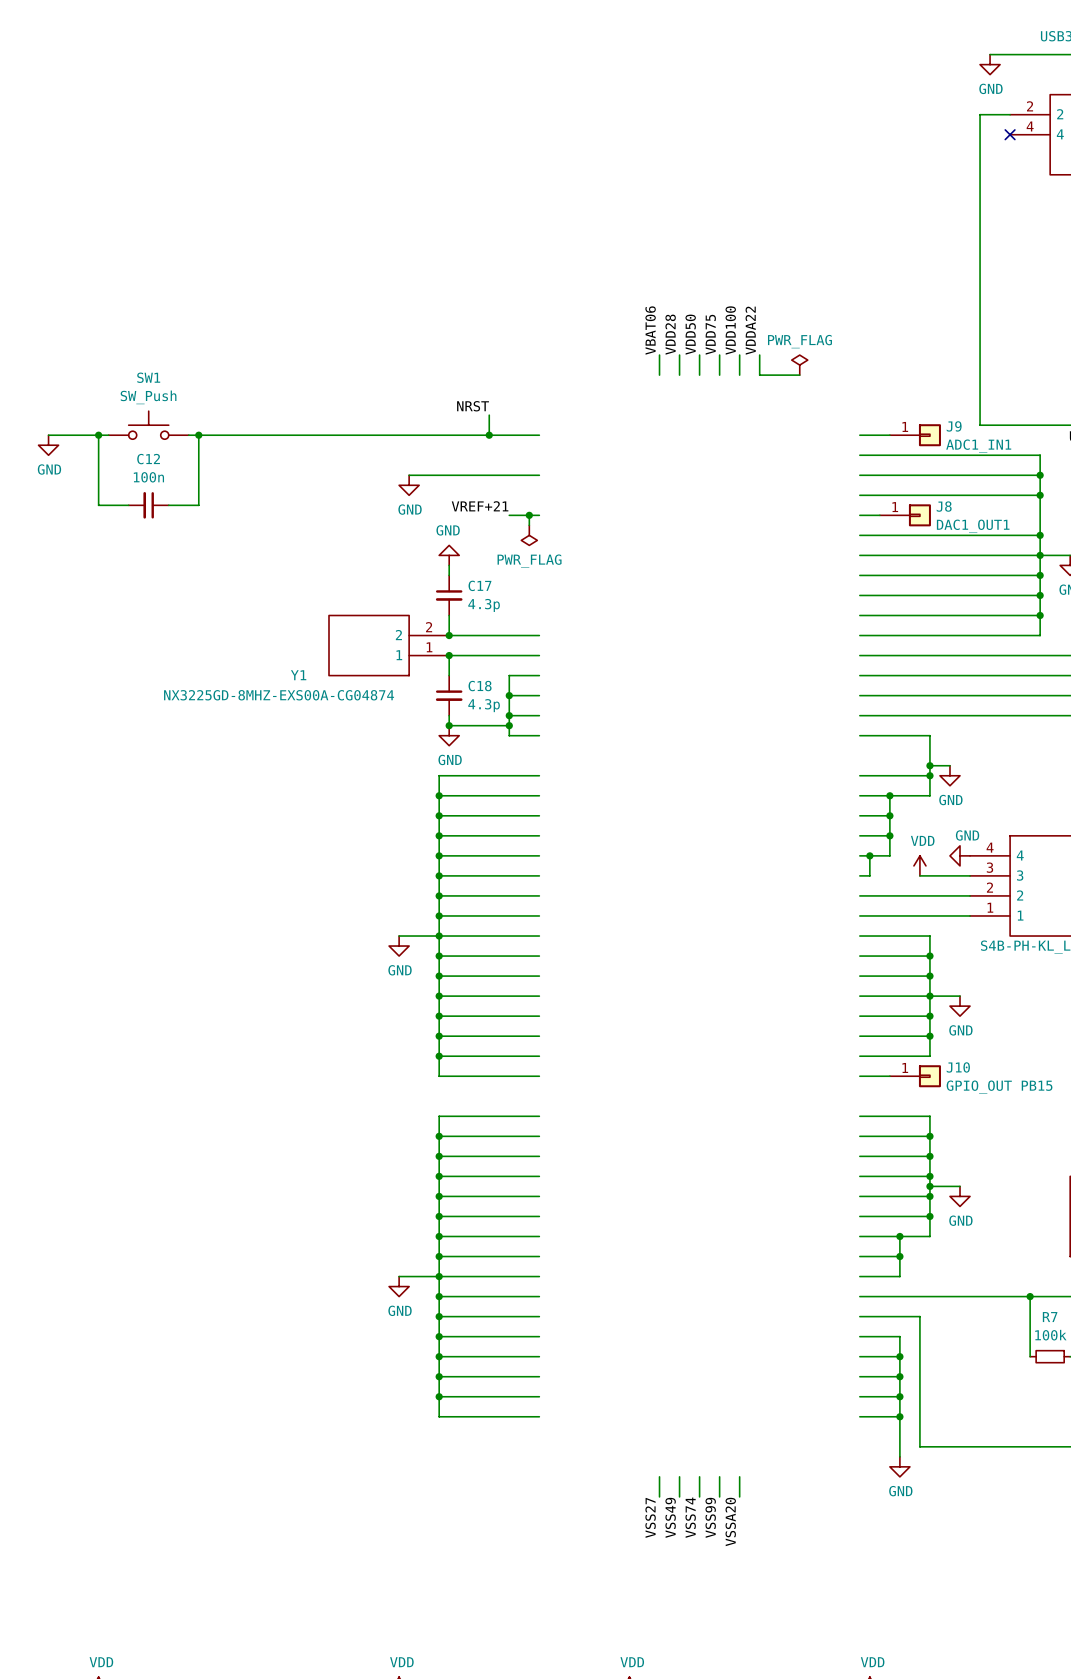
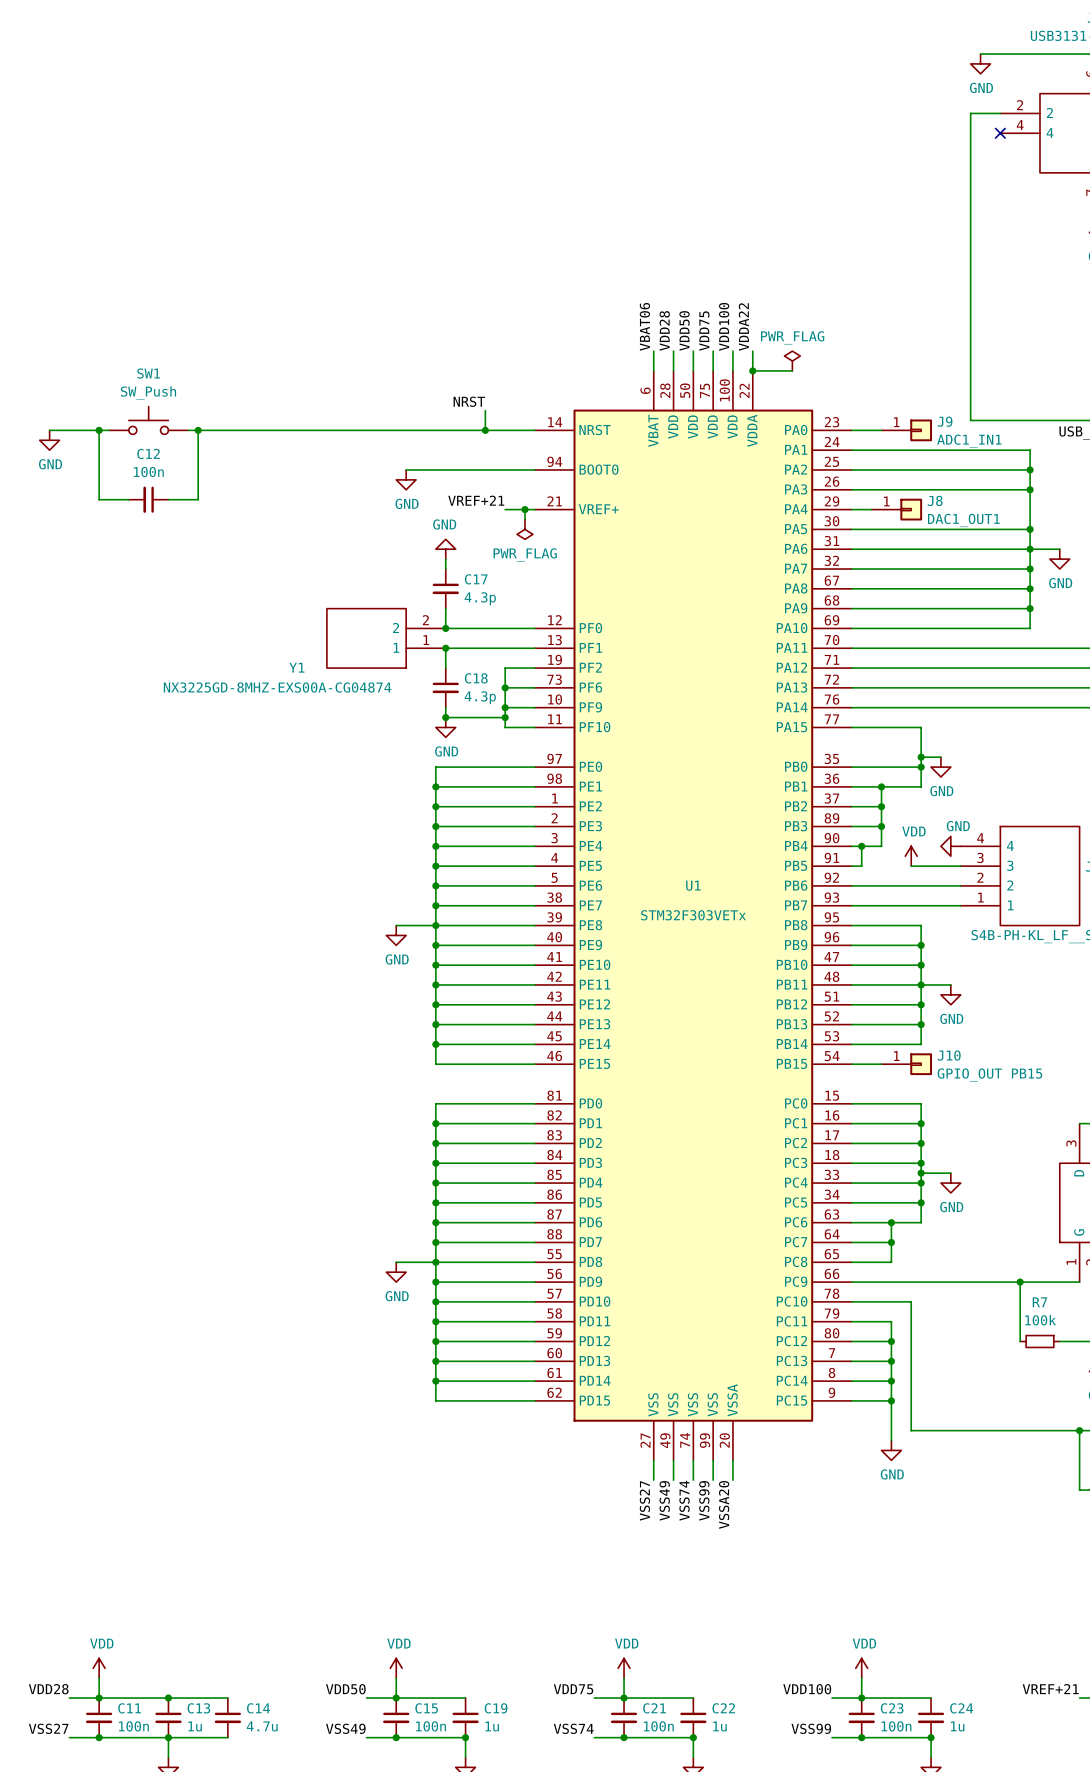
junction: none -> (752, 370)
U1: none -> STM32F303VETx (693, 915)

